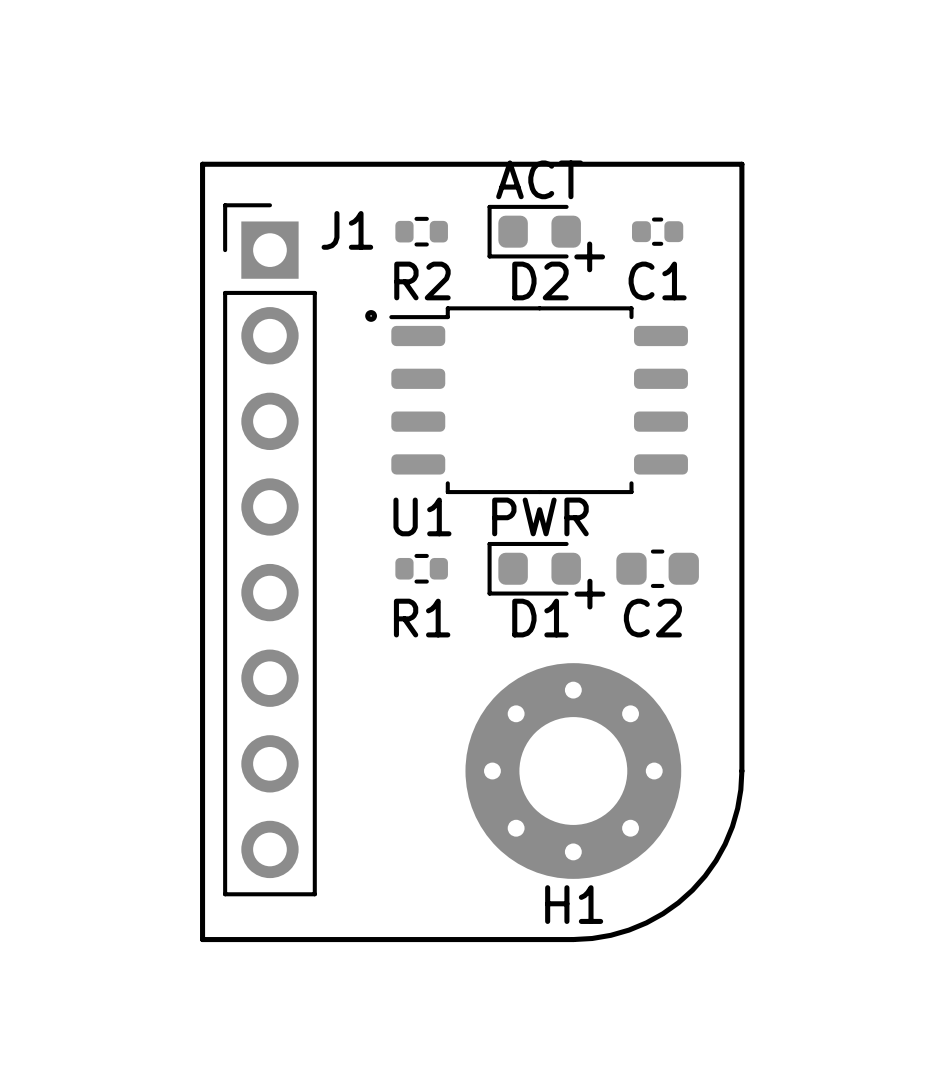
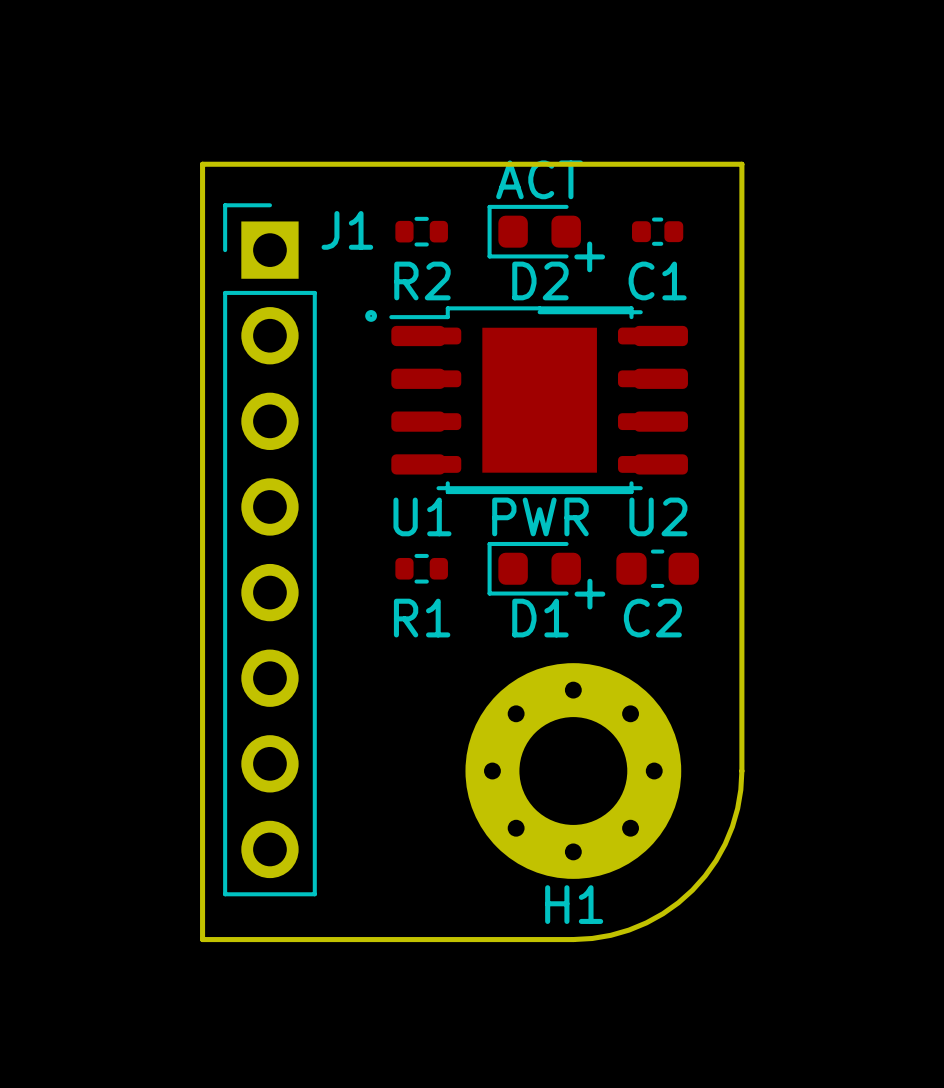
U2: none -> (539, 400)

